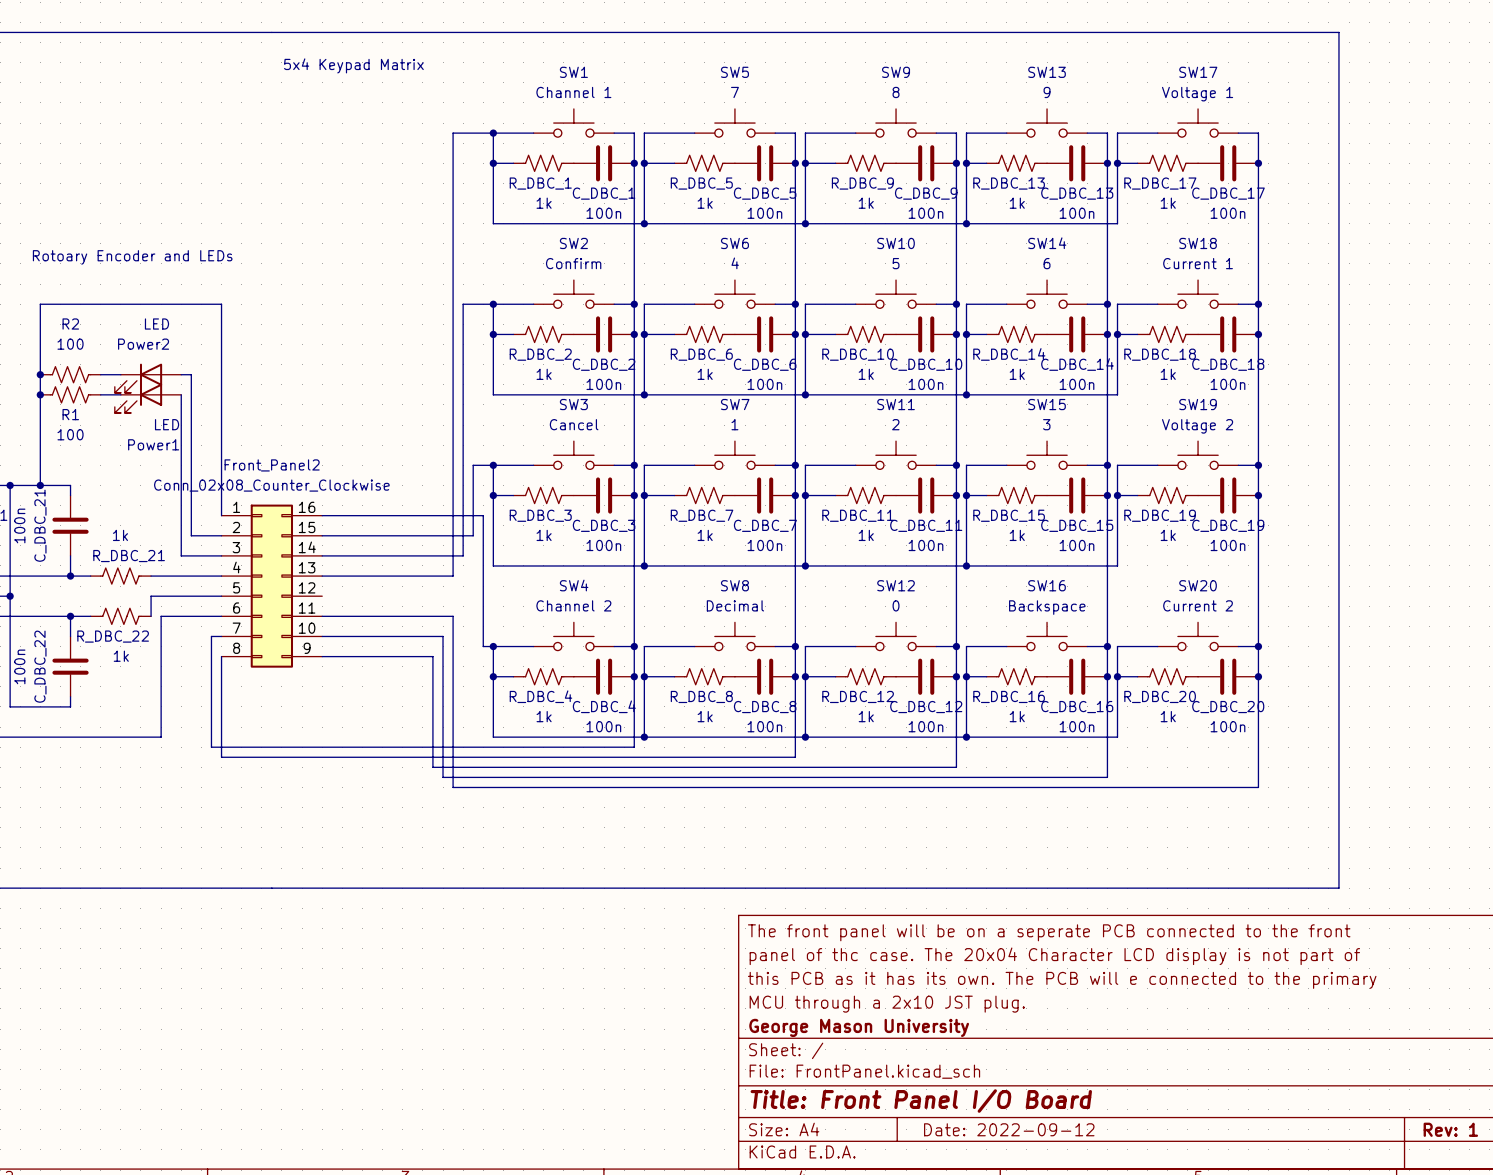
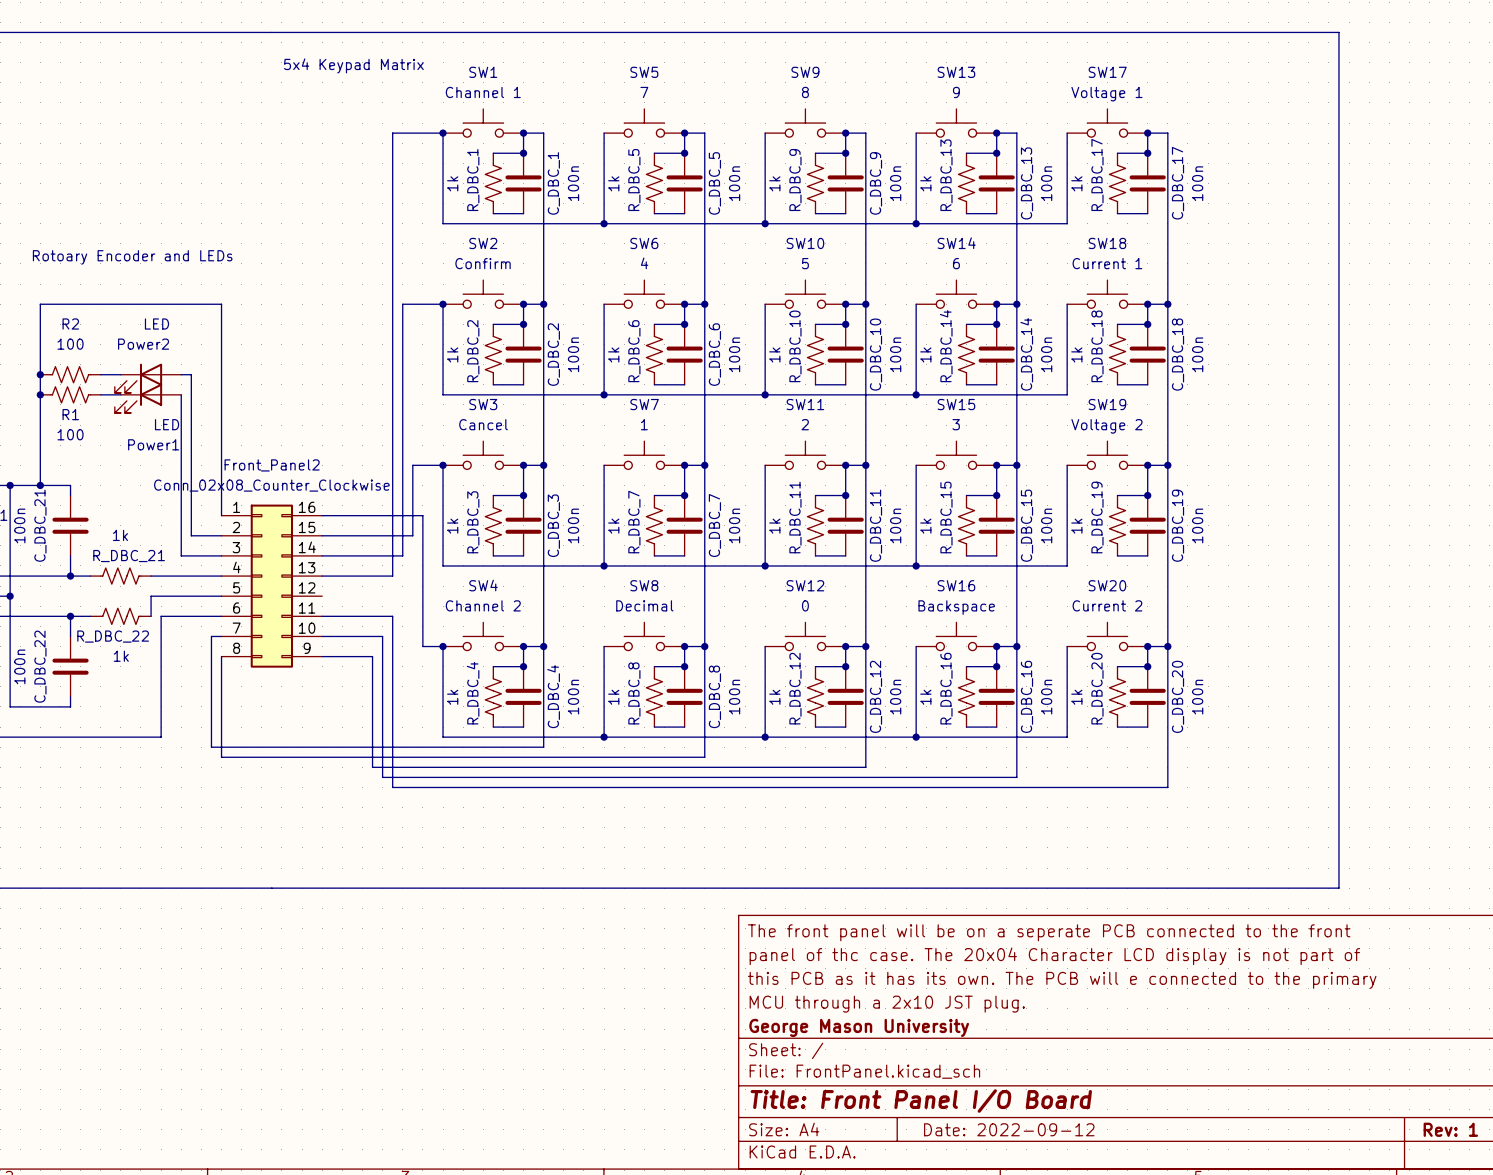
SW1 position: (573, 123) -> (483, 123)
SW5 position: (734, 123) -> (644, 123)
SW9 position: (896, 123) -> (805, 123)
SW13 position: (1047, 123) -> (956, 123)
SW17 position: (1198, 123) -> (1107, 123)
junction: none -> (443, 133)
wire: (493, 133) (493, 223) -> (604, 133) (604, 223)
junction: (493, 133) -> none
wire: (523, 133) (453, 133) (453, 576) (392, 576) -> (493, 223) (443, 223) (443, 133) (392, 133) (392, 576)
wire: none -> (523, 133) (523, 153) (493, 153)
junction: none -> (523, 133)
wire: (614, 133) (634, 133) (634, 747) (543, 747) -> (533, 133) (543, 133) (543, 747)
wire: (684, 133) (644, 133) (644, 223) -> (684, 133) (684, 153) (654, 153)
junction: none -> (684, 133)
wire: none -> (765, 133) (765, 223)
wire: (775, 133) (795, 133) (795, 757) (704, 757) -> (694, 133) (704, 133) (704, 757)
wire: (845, 133) (805, 133) (805, 223) -> (845, 133) (845, 153) (815, 153)
junction: none -> (845, 133)
wire: none -> (916, 133) (916, 223)
wire: (936, 133) (956, 133) (956, 767) (865, 767) -> (855, 133) (865, 133) (865, 767)
wire: (996, 133) (966, 133) (966, 223) -> (996, 133) (996, 153) (966, 153)
junction: none -> (996, 133)
wire: (1087, 133) (1107, 133) (1107, 777) (1016, 777) -> (1006, 133) (1016, 133) (1016, 777)
wire: (1147, 133) (1117, 133) (1117, 223) (1067, 223) -> (1067, 133) (1067, 223)
wire: none -> (1147, 133) (1147, 153) (1117, 153)
junction: none -> (1147, 133)
wire: (1238, 133) (1258, 133) (1258, 787) (1167, 787) -> (1157, 133) (1167, 133) (1167, 787)
junction: none -> (523, 153)
junction: none -> (684, 153)
junction: none -> (845, 153)
junction: none -> (996, 153)
junction: none -> (1147, 153)
wire: (493, 163) (513, 163) -> none
junction: (493, 163) -> none
R_DBC_1 rotation: 0° (543, 163) -> 90° clockwise (493, 183)
R_DBC_1 position: (543, 163) -> (493, 183)
C_DBC_1 rotation: 0° (604, 163) -> 90° clockwise (523, 183)
C_DBC_1 position: (604, 163) -> (523, 183)
junction: (634, 163) -> none
wire: (644, 163) (674, 163) -> (654, 213) (684, 213)
junction: (644, 163) -> none
R_DBC_5 rotation: 0° (704, 163) -> 90° clockwise (654, 183)
R_DBC_5 position: (704, 163) -> (654, 183)
C_DBC_5 rotation: 0° (765, 163) -> 90° clockwise (684, 183)
C_DBC_5 position: (765, 163) -> (684, 183)
junction: (795, 163) -> none
wire: (805, 163) (835, 163) -> (815, 213) (845, 213)
junction: (805, 163) -> none
R_DBC_9 rotation: 0° (865, 163) -> 90° clockwise (815, 183)
R_DBC_9 position: (865, 163) -> (815, 183)
C_DBC_9 rotation: 0° (926, 163) -> 90° clockwise (845, 183)
C_DBC_9 position: (926, 163) -> (845, 183)
junction: (956, 163) -> none
wire: (966, 163) (986, 163) -> none
junction: (966, 163) -> none
R_DBC_13 rotation: 0° (1016, 163) -> 90° clockwise (966, 183)
R_DBC_13 position: (1016, 163) -> (966, 183)
C_DBC_13 rotation: 0° (1077, 163) -> 90° clockwise (996, 183)
C_DBC_13 position: (1077, 163) -> (996, 183)
junction: (1107, 163) -> none
wire: (1117, 163) (1137, 163) -> none
junction: (1117, 163) -> none
R_DBC_17 rotation: 0° (1167, 163) -> 90° clockwise (1117, 183)
R_DBC_17 position: (1167, 163) -> (1117, 183)
C_DBC_17 rotation: 0° (1228, 163) -> 90° clockwise (1147, 183)
C_DBC_17 position: (1228, 163) -> (1147, 183)
junction: (1258, 163) -> none
C_DBC_1 name position: C_DBC_1 (604, 193) -> C_DBC_1 (553, 183)
C_DBC_5 name position: C_DBC_5 (765, 193) -> C_DBC_5 (714, 183)
C_DBC_9 name position: C_DBC_9 (926, 193) -> C_DBC_9 (875, 183)
C_DBC_13 name position: C_DBC_13 (1077, 193) -> C_DBC_13 (1027, 183)
C_DBC_17 name position: C_DBC_17 (1228, 193) -> C_DBC_17 (1178, 183)
wire: none -> (493, 213) (523, 213)
C_DBC_1 value position: 100n (603, 213) -> 100n (573, 183)
C_DBC_5 value position: 100n (764, 213) -> 100n (734, 183)
C_DBC_9 value position: 100n (925, 213) -> 100n (895, 183)
wire: none -> (966, 213) (996, 213)
C_DBC_13 value position: 100n (1076, 213) -> 100n (1046, 183)
wire: none -> (1117, 213) (1147, 213)
C_DBC_17 value position: 100n (1228, 213) -> 100n (1197, 183)
junction: none -> (604, 223)
junction: (644, 223) -> none
junction: none -> (765, 223)
junction: (805, 223) -> none
junction: none -> (916, 223)
junction: (966, 223) -> none
SW2 position: (573, 294) -> (483, 294)
SW6 position: (734, 294) -> (644, 294)
SW10 position: (896, 294) -> (805, 294)
SW14 position: (1047, 294) -> (956, 294)
SW18 position: (1198, 294) -> (1107, 294)
junction: none -> (443, 304)
wire: (493, 304) (493, 394) -> (604, 304) (604, 394)
junction: (493, 304) -> none
wire: (523, 304) (463, 304) (463, 555) (402, 555) -> (493, 394) (443, 394) (443, 304) (402, 304) (402, 555)
wire: none -> (523, 304) (523, 324) (493, 324)
junction: none -> (523, 304)
junction: none -> (543, 304)
junction: (634, 304) -> none
wire: (684, 304) (644, 304) (644, 394) -> (684, 304) (684, 324) (654, 324)
junction: none -> (684, 304)
junction: none -> (704, 304)
wire: none -> (765, 304) (765, 394)
junction: (795, 304) -> none
wire: (845, 304) (805, 304) (805, 394) -> (845, 304) (845, 324) (815, 324)
junction: none -> (845, 304)
junction: none -> (865, 304)
wire: none -> (916, 304) (916, 394)
wire: (936, 304) (956, 304) -> none
junction: (956, 304) -> none
wire: (996, 304) (966, 304) (966, 394) -> (996, 304) (996, 324) (966, 324)
junction: none -> (996, 304)
junction: none -> (1016, 304)
wire: (1087, 304) (1107, 304) -> none
junction: (1107, 304) -> none
wire: (1147, 304) (1117, 304) (1117, 394) (1067, 394) -> (1067, 304) (1067, 394)
wire: none -> (1147, 304) (1147, 324) (1117, 324)
junction: none -> (1147, 304)
junction: none -> (1167, 304)
wire: (1238, 304) (1258, 304) -> none
junction: (1258, 304) -> none
junction: none -> (523, 324)
junction: none -> (684, 324)
junction: none -> (845, 324)
junction: none -> (996, 324)
junction: none -> (1147, 324)
wire: (493, 334) (513, 334) -> none
junction: (493, 334) -> none
R_DBC_2 rotation: 0° (543, 334) -> 90° clockwise (493, 354)
R_DBC_2 position: (543, 334) -> (493, 354)
C_DBC_2 rotation: 0° (604, 334) -> 90° clockwise (523, 354)
C_DBC_2 position: (604, 334) -> (523, 354)
junction: (634, 334) -> none
wire: (644, 334) (674, 334) -> (654, 384) (684, 384)
junction: (644, 334) -> none
R_DBC_6 rotation: 0° (704, 334) -> 90° clockwise (654, 354)
R_DBC_6 position: (704, 334) -> (654, 354)
C_DBC_6 rotation: 0° (765, 334) -> 90° clockwise (684, 354)
C_DBC_6 position: (765, 334) -> (684, 354)
junction: (795, 334) -> none
wire: (805, 334) (835, 334) -> (815, 384) (845, 384)
junction: (805, 334) -> none
R_DBC_10 rotation: 0° (865, 334) -> 90° clockwise (815, 354)
R_DBC_10 position: (865, 334) -> (815, 354)
C_DBC_10 rotation: 0° (926, 334) -> 90° clockwise (845, 354)
C_DBC_10 position: (926, 334) -> (845, 354)
junction: (956, 334) -> none
wire: (966, 334) (986, 334) -> none
junction: (966, 334) -> none
R_DBC_14 rotation: 0° (1016, 334) -> 90° clockwise (966, 354)
R_DBC_14 position: (1016, 334) -> (966, 354)
C_DBC_14 rotation: 0° (1077, 334) -> 90° clockwise (996, 354)
C_DBC_14 position: (1077, 334) -> (996, 354)
junction: (1107, 334) -> none
wire: (1117, 334) (1137, 334) -> none
junction: (1117, 334) -> none
R_DBC_18 rotation: 0° (1167, 334) -> 90° clockwise (1117, 354)
R_DBC_18 position: (1167, 334) -> (1117, 354)
C_DBC_18 rotation: 0° (1228, 334) -> 90° clockwise (1147, 354)
C_DBC_18 position: (1228, 334) -> (1147, 354)
junction: (1258, 334) -> none
C_DBC_2 name position: C_DBC_2 (604, 364) -> C_DBC_2 (553, 354)
C_DBC_6 name position: C_DBC_6 (765, 364) -> C_DBC_6 (714, 354)
C_DBC_10 name position: C_DBC_10 (926, 364) -> C_DBC_10 (875, 354)
C_DBC_14 name position: C_DBC_14 (1077, 364) -> C_DBC_14 (1026, 354)
C_DBC_18 name position: C_DBC_18 (1228, 364) -> C_DBC_18 (1178, 354)
wire: none -> (493, 384) (523, 384)
C_DBC_2 value position: 100n (603, 384) -> 100n (573, 354)
C_DBC_6 value position: 100n (764, 384) -> 100n (734, 354)
C_DBC_10 value position: 100n (925, 384) -> 100n (895, 354)
wire: none -> (966, 384) (996, 384)
C_DBC_14 value position: 100n (1076, 384) -> 100n (1046, 354)
wire: none -> (1117, 384) (1147, 384)
C_DBC_18 value position: 100n (1228, 384) -> 100n (1197, 354)
junction: none -> (604, 394)
junction: (644, 394) -> none
junction: none -> (765, 394)
junction: (805, 394) -> none
junction: none -> (916, 394)
junction: (966, 394) -> none
SW3 position: (573, 455) -> (483, 455)
SW7 position: (734, 455) -> (644, 455)
SW11 position: (896, 455) -> (805, 455)
SW15 position: (1047, 455) -> (956, 455)
SW19 position: (1198, 455) -> (1107, 455)
junction: none -> (443, 465)
wire: (493, 465) (493, 565) -> (604, 465) (604, 565)
junction: (493, 465) -> none
wire: (523, 465) (473, 465) (473, 535) (412, 535) -> (493, 565) (443, 565) (443, 465) (412, 465) (412, 535)
wire: none -> (523, 465) (523, 495) (513, 495)
junction: none -> (523, 465)
junction: none -> (543, 465)
junction: (634, 465) -> none
wire: (684, 465) (644, 465) (644, 565) -> (684, 465) (684, 495) (674, 495)
junction: none -> (684, 465)
junction: none -> (704, 465)
wire: none -> (765, 465) (765, 565)
junction: (795, 465) -> none
wire: (845, 465) (805, 465) (805, 565) -> (845, 465) (845, 495) (835, 495)
junction: none -> (845, 465)
junction: none -> (865, 465)
wire: none -> (916, 465) (916, 565)
wire: (936, 465) (956, 465) -> none
junction: (956, 465) -> none
wire: (996, 465) (966, 465) (966, 565) -> (996, 465) (996, 495) (986, 495)
junction: none -> (996, 465)
junction: none -> (1016, 465)
wire: (1087, 465) (1107, 465) -> none
junction: (1107, 465) -> none
wire: (1147, 465) (1117, 465) (1117, 565) (1067, 565) -> (1067, 465) (1067, 565)
wire: none -> (1147, 465) (1147, 495) (1137, 495)
junction: none -> (1147, 465)
junction: none -> (1167, 465)
wire: (1238, 465) (1258, 465) -> none
junction: (1258, 465) -> none
junction: (493, 495) -> none
junction: none -> (523, 495)
R_DBC_3 rotation: 0° (543, 495) -> 90° clockwise (493, 525)
R_DBC_3 position: (543, 495) -> (493, 525)
C_DBC_3 rotation: 0° (604, 495) -> 90° clockwise (523, 525)
C_DBC_3 position: (604, 495) -> (523, 525)
junction: (634, 495) -> none
junction: (644, 495) -> none
junction: none -> (684, 495)
R_DBC_7 rotation: 0° (704, 495) -> 90° clockwise (654, 525)
R_DBC_7 position: (704, 495) -> (654, 525)
C_DBC_7 rotation: 0° (765, 495) -> 90° clockwise (684, 525)
C_DBC_7 position: (765, 495) -> (684, 525)
junction: (795, 495) -> none
junction: (805, 495) -> none
junction: none -> (845, 495)
R_DBC_11 rotation: 0° (865, 495) -> 90° clockwise (815, 525)
R_DBC_11 position: (865, 495) -> (815, 525)
C_DBC_11 rotation: 0° (926, 495) -> 90° clockwise (845, 525)
C_DBC_11 position: (926, 495) -> (845, 525)
junction: (956, 495) -> none
junction: (966, 495) -> none
junction: none -> (996, 495)
R_DBC_15 rotation: 0° (1016, 495) -> 90° clockwise (966, 525)
R_DBC_15 position: (1016, 495) -> (966, 525)
C_DBC_15 rotation: 0° (1077, 495) -> 90° clockwise (996, 525)
C_DBC_15 position: (1077, 495) -> (996, 525)
junction: (1107, 495) -> none
junction: (1117, 495) -> none
junction: none -> (1147, 495)
R_DBC_19 rotation: 0° (1167, 495) -> 90° clockwise (1117, 525)
R_DBC_19 position: (1167, 495) -> (1117, 525)
C_DBC_19 rotation: 0° (1228, 495) -> 90° clockwise (1147, 525)
C_DBC_19 position: (1228, 495) -> (1147, 525)
junction: (1258, 495) -> none
wire: (422, 515) (483, 515) (483, 646) (523, 646) -> (422, 515) (422, 646) (443, 646)
C_DBC_3 name position: C_DBC_3 (604, 525) -> C_DBC_3 (553, 525)
C_DBC_7 name position: C_DBC_7 (765, 525) -> C_DBC_7 (714, 525)
C_DBC_11 name position: C_DBC_11 (926, 525) -> C_DBC_11 (875, 525)
C_DBC_15 name position: C_DBC_15 (1077, 525) -> C_DBC_15 (1027, 525)
C_DBC_19 name position: C_DBC_19 (1228, 525) -> C_DBC_19 (1178, 525)
C_DBC_3 value position: 100n (603, 545) -> 100n (573, 525)
C_DBC_7 value position: 100n (764, 545) -> 100n (734, 525)
C_DBC_11 value position: 100n (925, 545) -> 100n (895, 525)
C_DBC_15 value position: 100n (1076, 545) -> 100n (1046, 525)
C_DBC_19 value position: 100n (1228, 545) -> 100n (1197, 525)
wire: none -> (493, 555) (523, 555)
wire: none -> (654, 555) (684, 555)
wire: none -> (815, 555) (845, 555)
wire: none -> (966, 555) (996, 555)
wire: none -> (1117, 555) (1147, 555)
junction: none -> (604, 565)
junction: (644, 565) -> none
junction: none -> (765, 565)
junction: (805, 565) -> none
junction: none -> (916, 565)
junction: (966, 565) -> none
wire: (392, 616) (453, 616) (453, 787) -> (392, 616) (392, 787) (453, 787)
wire: (382, 636) (443, 636) (443, 646) -> (382, 636) (382, 777) (443, 777)
SW4 position: (573, 636) -> (483, 636)
SW8 position: (734, 636) -> (644, 636)
SW12 position: (896, 636) -> (805, 636)
SW16 position: (1047, 636) -> (956, 636)
SW20 position: (1198, 636) -> (1107, 636)
junction: none -> (443, 646)
wire: (493, 646) (493, 737) -> (604, 646) (604, 737)
junction: (493, 646) -> none
wire: none -> (523, 646) (523, 666) (493, 666)
junction: none -> (523, 646)
junction: none -> (543, 646)
junction: (634, 646) -> none
wire: (684, 646) (644, 646) (644, 737) -> (684, 646) (684, 666) (654, 666)
junction: none -> (684, 646)
junction: none -> (704, 646)
wire: none -> (765, 646) (765, 737)
junction: (795, 646) -> none
wire: (845, 646) (805, 646) (805, 737) -> (845, 646) (845, 666) (815, 666)
junction: none -> (845, 646)
junction: none -> (865, 646)
wire: none -> (916, 646) (916, 737)
wire: (936, 646) (956, 646) -> none
junction: (956, 646) -> none
wire: (996, 646) (966, 646) (966, 737) -> (996, 646) (996, 666) (966, 666)
junction: none -> (996, 646)
junction: none -> (1016, 646)
wire: (1087, 646) (1107, 646) -> none
junction: (1107, 646) -> none
wire: (1147, 646) (1117, 646) (1117, 737) (1067, 737) -> (1067, 646) (1067, 737)
wire: none -> (1147, 646) (1147, 666) (1117, 666)
junction: none -> (1147, 646)
junction: none -> (1167, 646)
wire: (1238, 646) (1258, 646) -> none
junction: (1258, 646) -> none
wire: (372, 656) (432, 656) (432, 767) -> (372, 656) (372, 767) (432, 767)
junction: none -> (523, 666)
junction: none -> (684, 666)
junction: none -> (845, 666)
junction: none -> (996, 666)
junction: none -> (1147, 666)
wire: (493, 676) (513, 676) -> none
junction: (493, 676) -> none
R_DBC_4 rotation: 0° (543, 676) -> 90° clockwise (493, 696)
R_DBC_4 position: (543, 676) -> (493, 696)
C_DBC_4 rotation: 0° (604, 676) -> 90° clockwise (523, 696)
C_DBC_4 position: (604, 676) -> (523, 696)
junction: (634, 676) -> none
wire: (644, 676) (674, 676) -> (654, 727) (684, 727)
junction: (644, 676) -> none
R_DBC_8 rotation: 0° (704, 676) -> 90° clockwise (654, 696)
R_DBC_8 position: (704, 676) -> (654, 696)
C_DBC_8 rotation: 0° (765, 676) -> 90° clockwise (684, 696)
C_DBC_8 position: (765, 676) -> (684, 696)
junction: (795, 676) -> none
wire: (805, 676) (835, 676) -> (815, 727) (845, 727)
junction: (805, 676) -> none
R_DBC_12 rotation: 0° (865, 676) -> 90° clockwise (815, 696)
R_DBC_12 position: (865, 676) -> (815, 696)
C_DBC_12 rotation: 0° (926, 676) -> 90° clockwise (845, 696)
C_DBC_12 position: (926, 676) -> (845, 696)
junction: (956, 676) -> none
wire: (966, 676) (986, 676) -> none
junction: (966, 676) -> none
R_DBC_16 rotation: 0° (1016, 676) -> 90° clockwise (966, 696)
R_DBC_16 position: (1016, 676) -> (966, 696)
C_DBC_16 rotation: 0° (1077, 676) -> 90° clockwise (996, 696)
C_DBC_16 position: (1077, 676) -> (996, 696)
junction: (1107, 676) -> none
wire: (1117, 676) (1137, 676) -> none
junction: (1117, 676) -> none
R_DBC_20 rotation: 0° (1167, 676) -> 90° clockwise (1117, 696)
R_DBC_20 position: (1167, 676) -> (1117, 696)
C_DBC_20 rotation: 0° (1228, 676) -> 90° clockwise (1147, 696)
C_DBC_20 position: (1228, 676) -> (1147, 696)
junction: (1258, 676) -> none
C_DBC_4 name position: C_DBC_4 (604, 706) -> C_DBC_4 (553, 696)
C_DBC_8 name position: C_DBC_8 (765, 707) -> C_DBC_8 (714, 696)
C_DBC_12 name position: C_DBC_12 (926, 707) -> C_DBC_12 (875, 696)
C_DBC_16 name position: C_DBC_16 (1077, 707) -> C_DBC_16 (1027, 696)
C_DBC_20 name position: C_DBC_20 (1228, 707) -> C_DBC_20 (1178, 696)
C_DBC_4 value position: 100n (603, 726) -> 100n (573, 697)
C_DBC_8 value position: 100n (764, 726) -> 100n (734, 697)
C_DBC_12 value position: 100n (925, 726) -> 100n (895, 697)
C_DBC_16 value position: 100n (1076, 726) -> 100n (1046, 697)
C_DBC_20 value position: 100n (1228, 726) -> 100n (1197, 697)
wire: none -> (493, 727) (523, 727)
wire: none -> (966, 727) (996, 727)
wire: none -> (1117, 727) (1147, 727)
wire: (443, 737) (443, 777) -> (443, 737) (493, 737)
junction: none -> (604, 737)
junction: (644, 737) -> none
junction: none -> (765, 737)
junction: (805, 737) -> none
junction: none -> (916, 737)
junction: (966, 737) -> none

